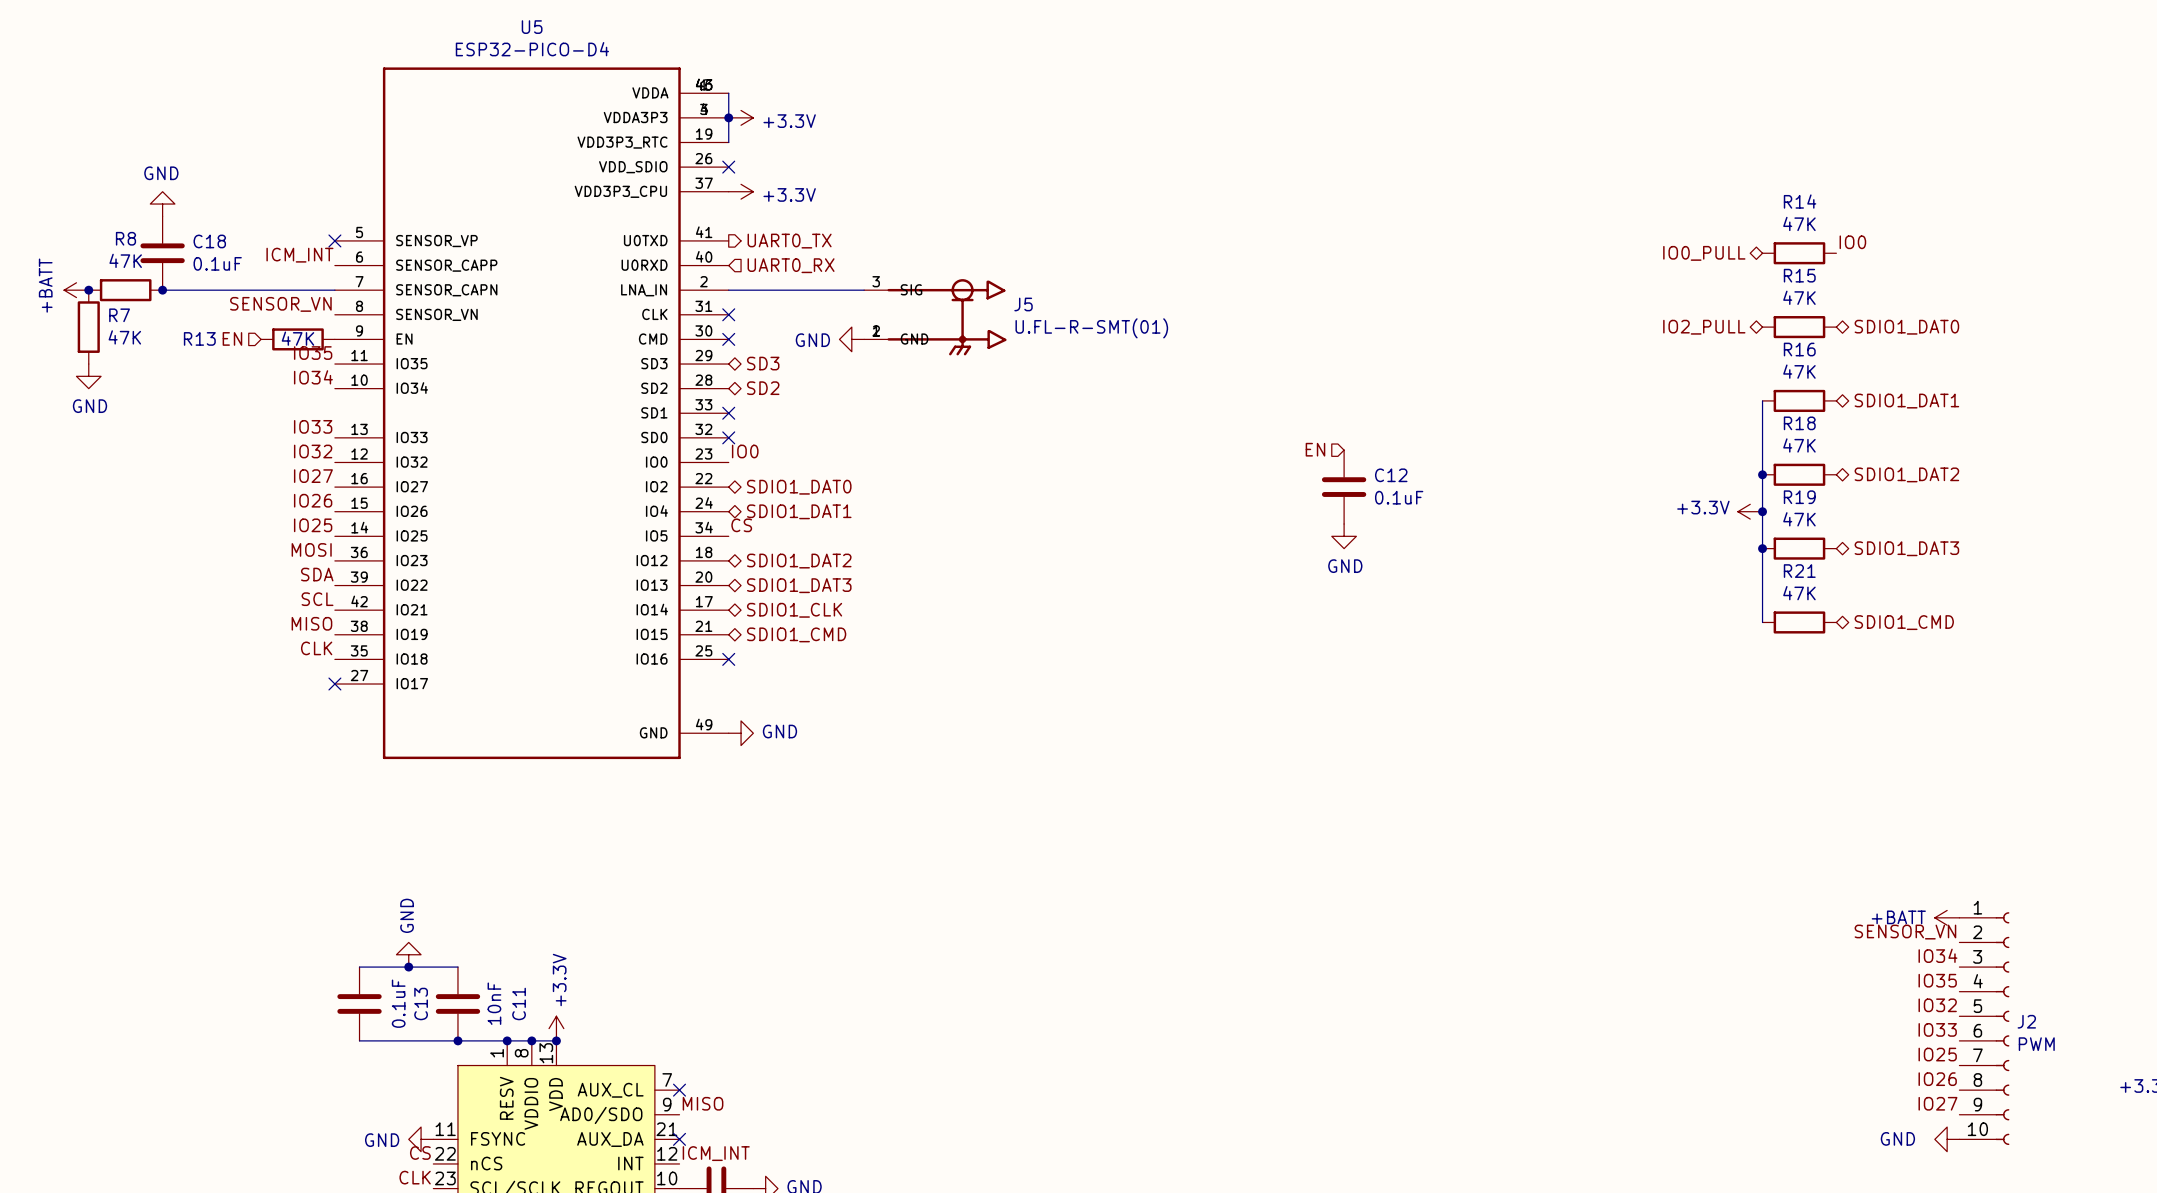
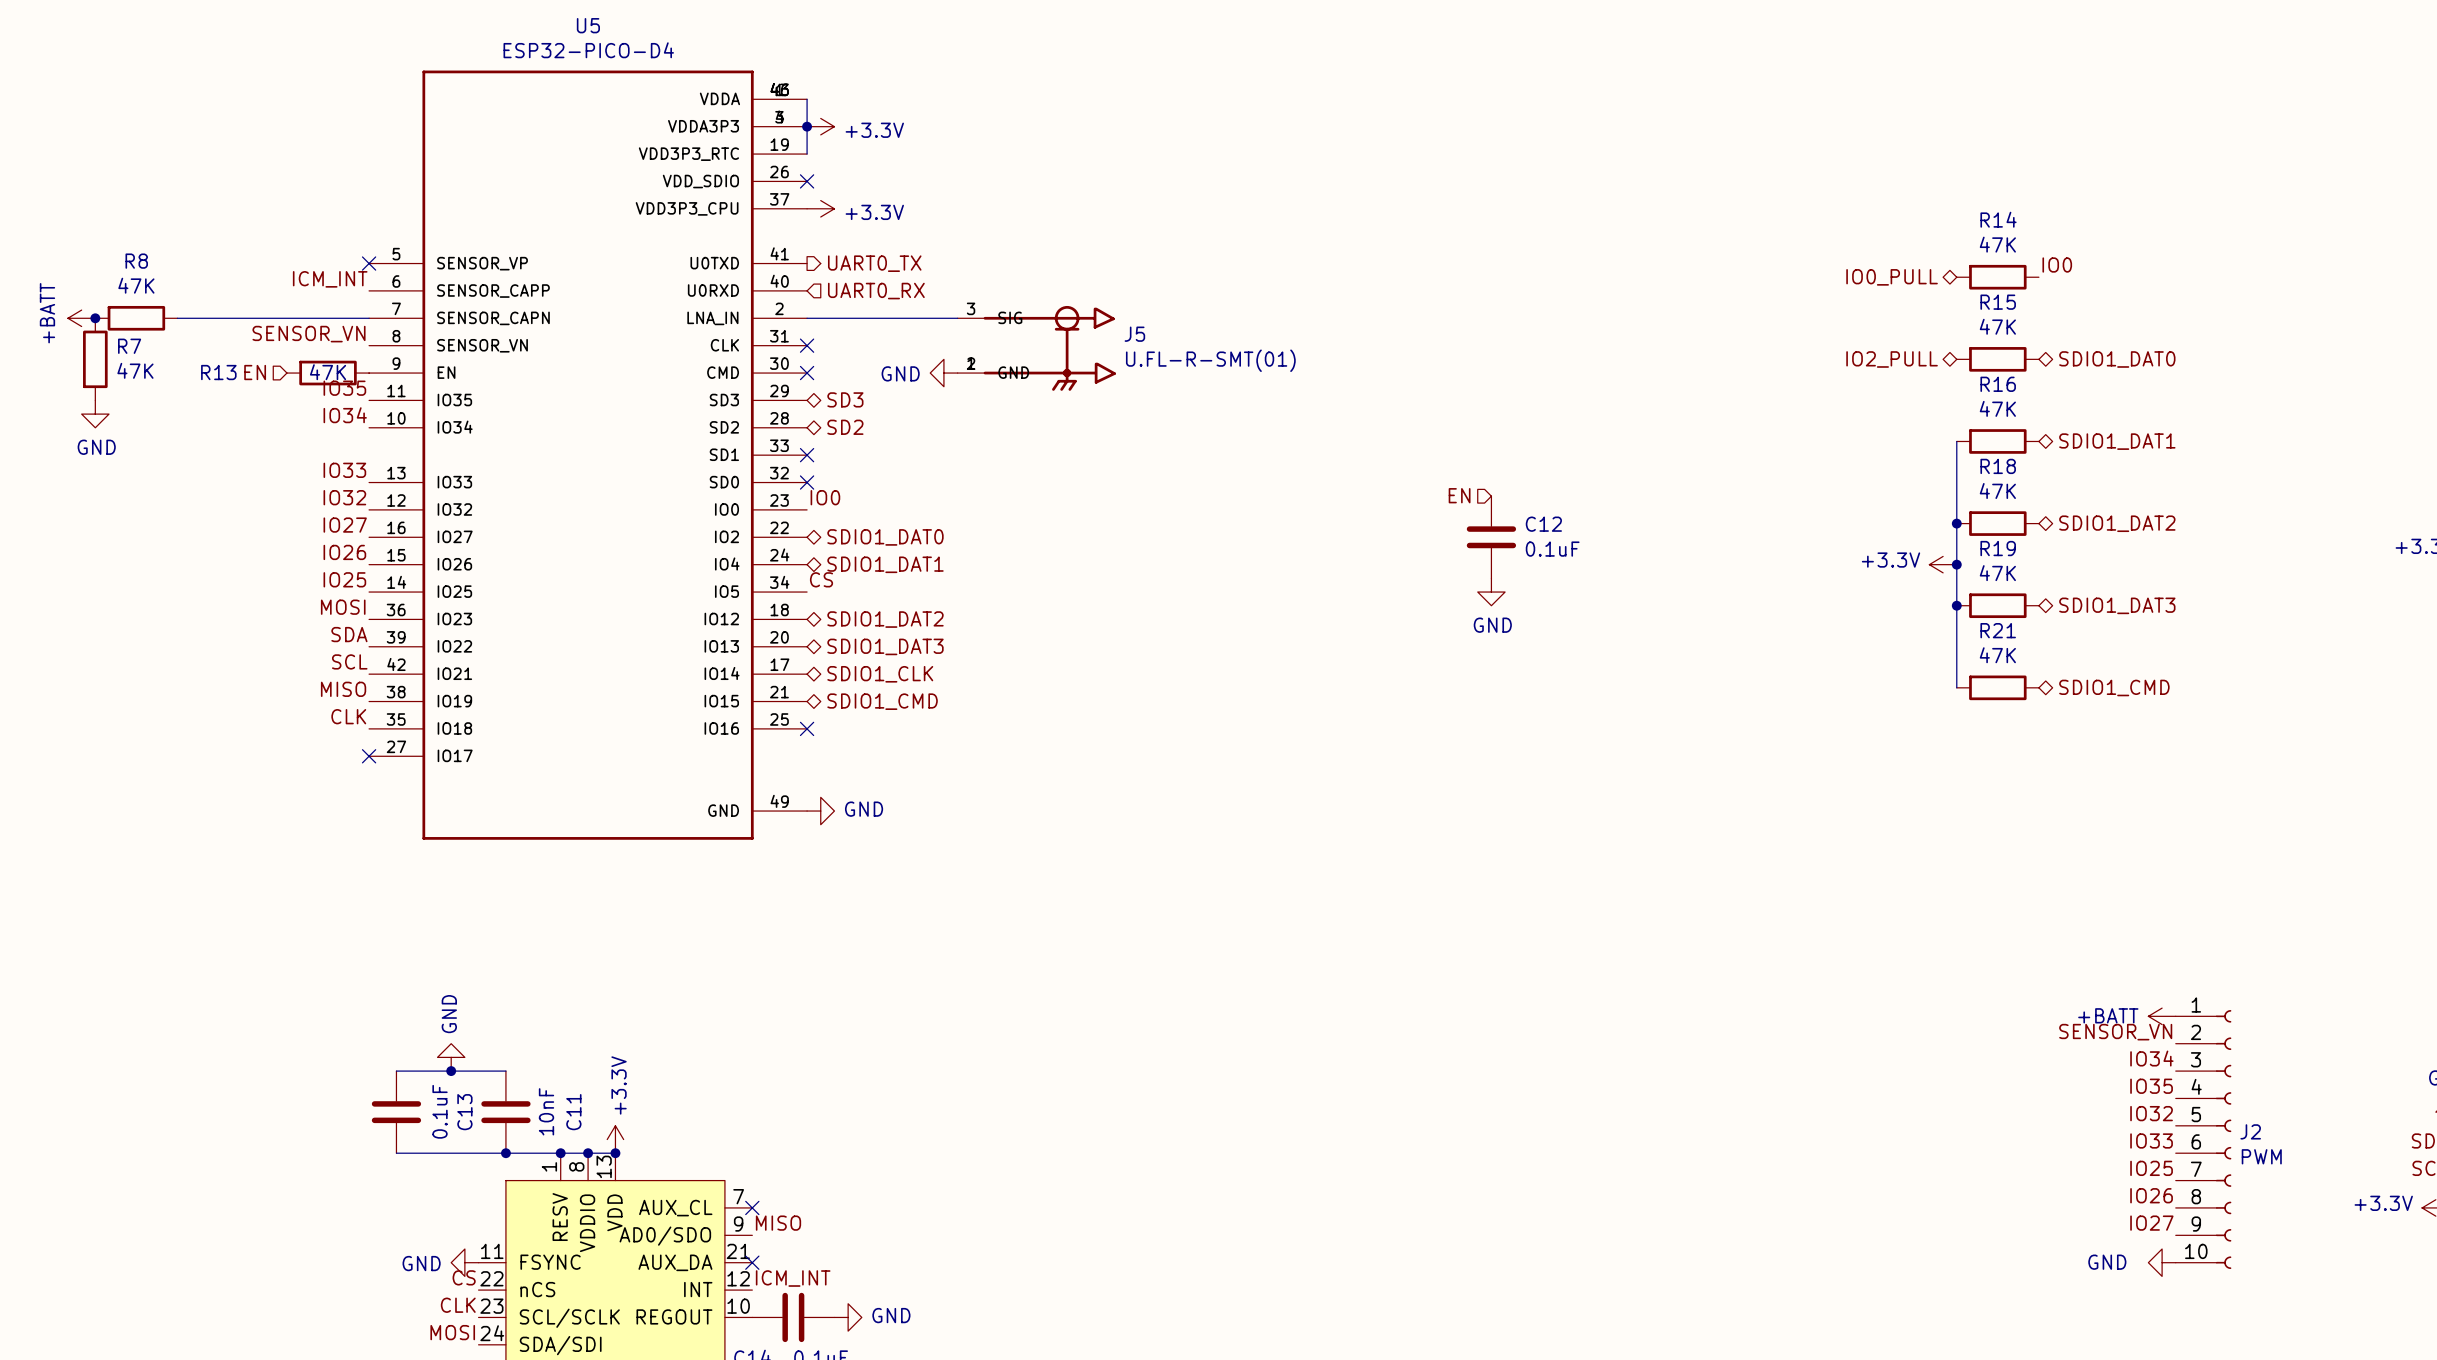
power symbol: GND (162, 204) -> none
C18: 0.1uF (162, 253) -> none
junction: (162, 290) -> none

